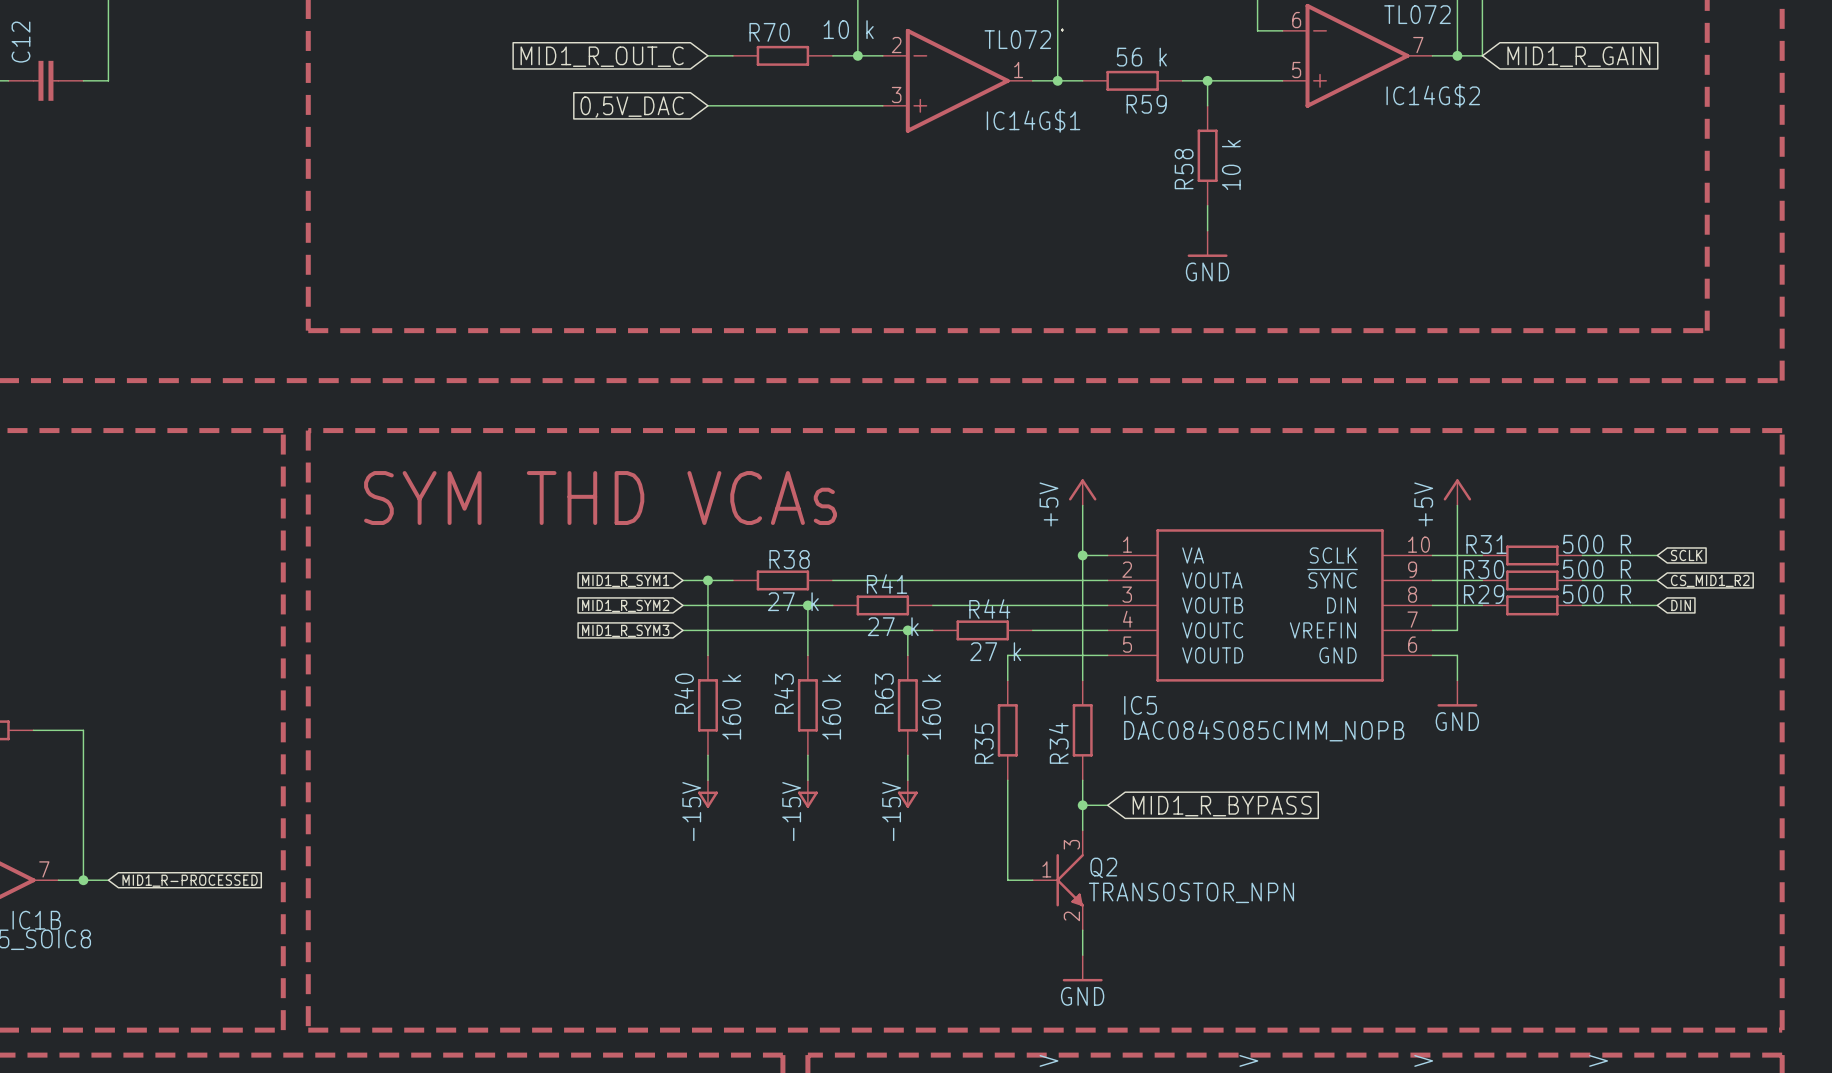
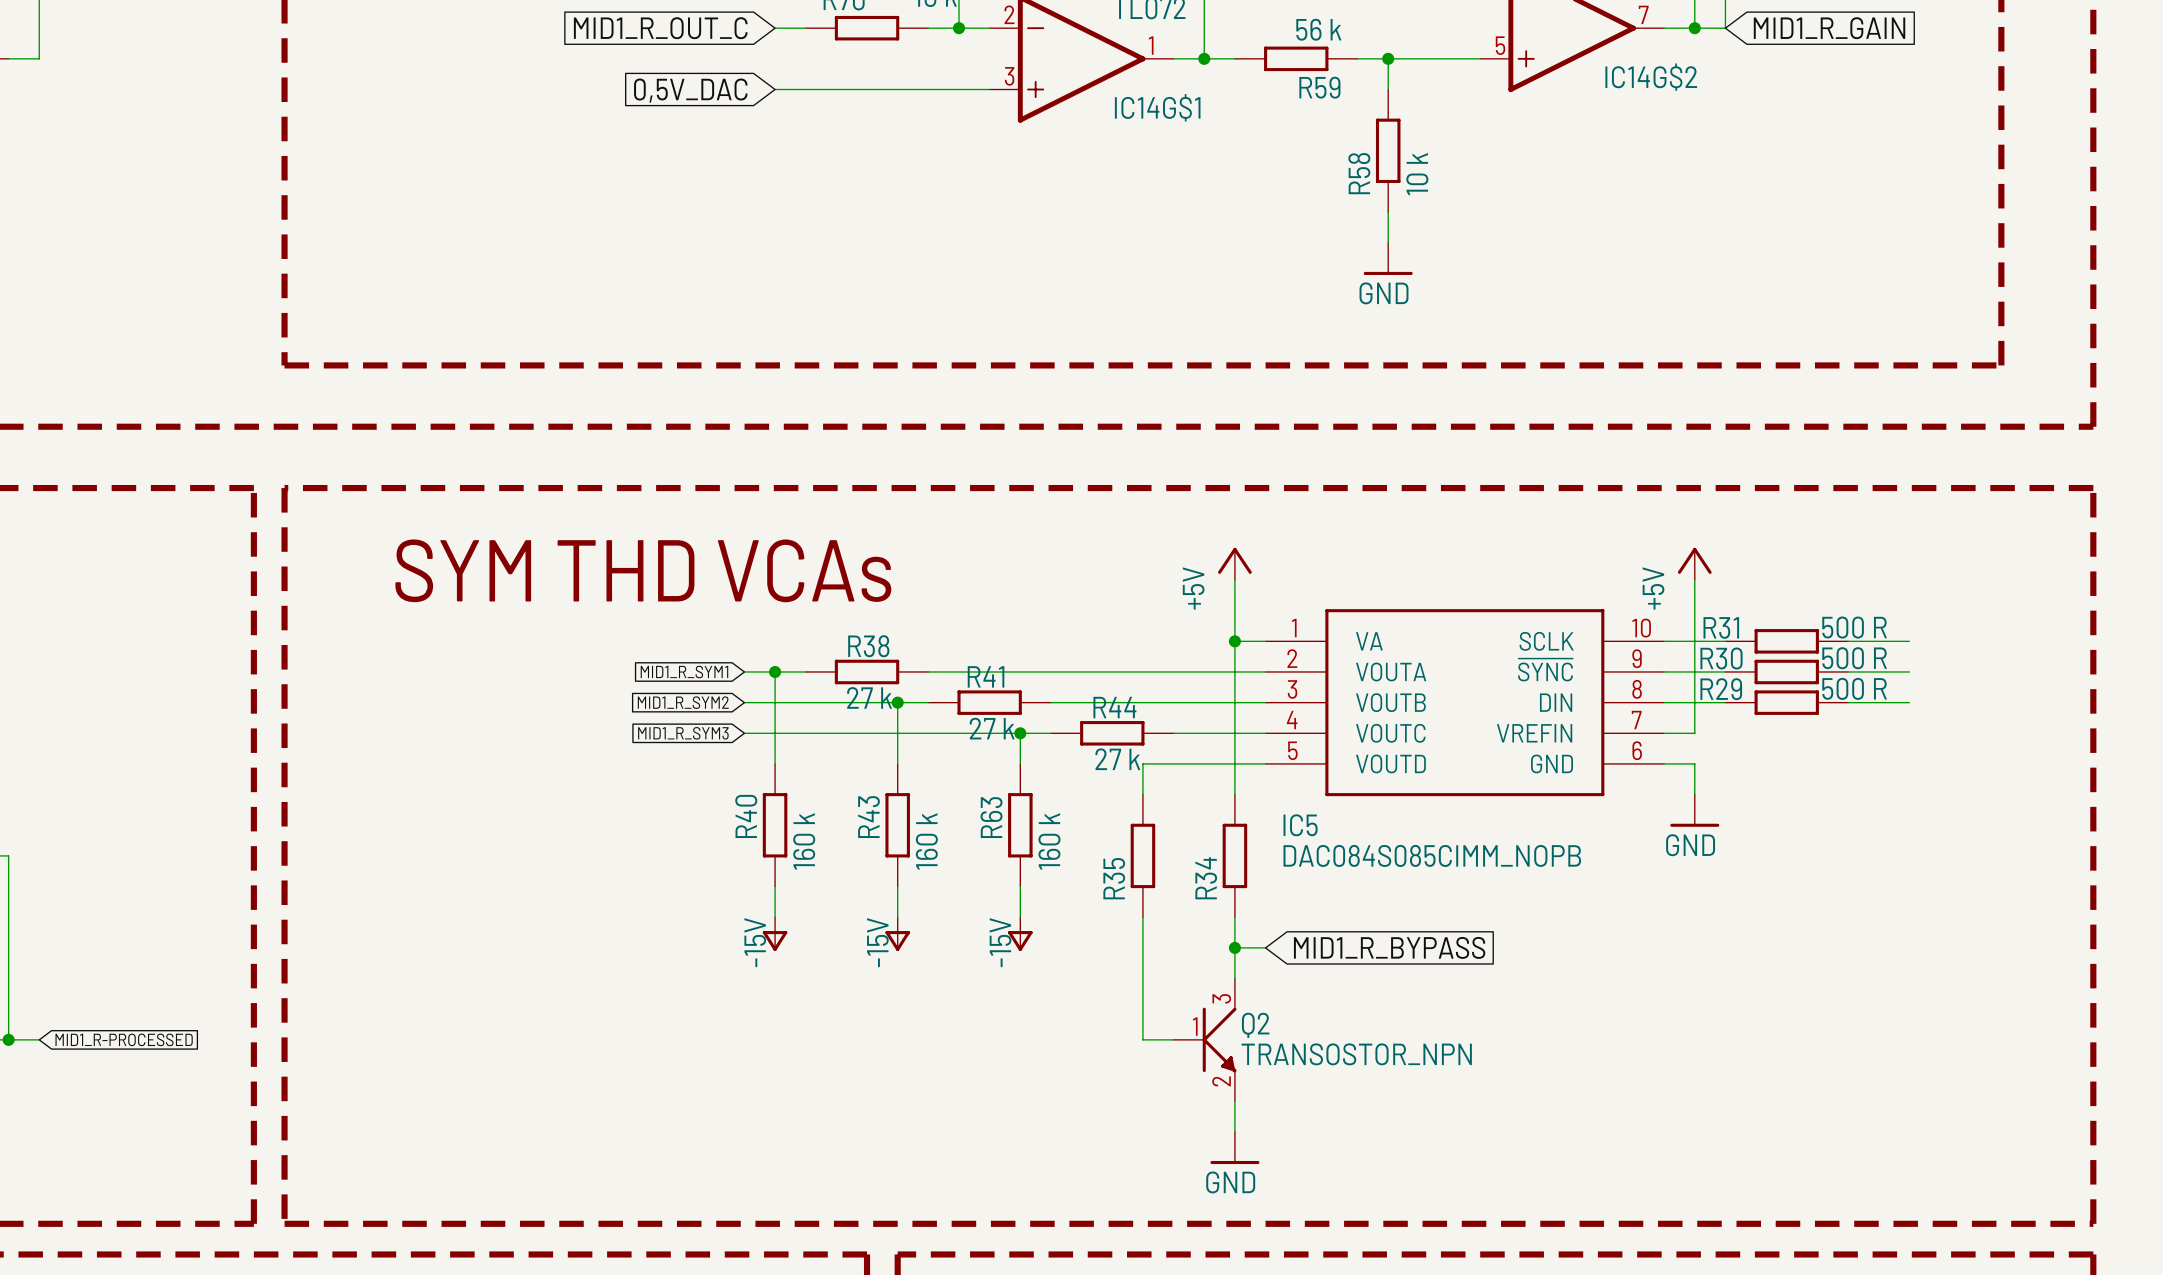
wire: (1632, 555) (1657, 555) -> none
global label: SCLK (1686, 555) -> none
wire: (1632, 580) (1657, 580) -> none
global label: CS_MID1_R2 (1710, 580) -> none
wire: (1632, 605) (1657, 605) -> none
global label: DIN (1681, 605) -> none

